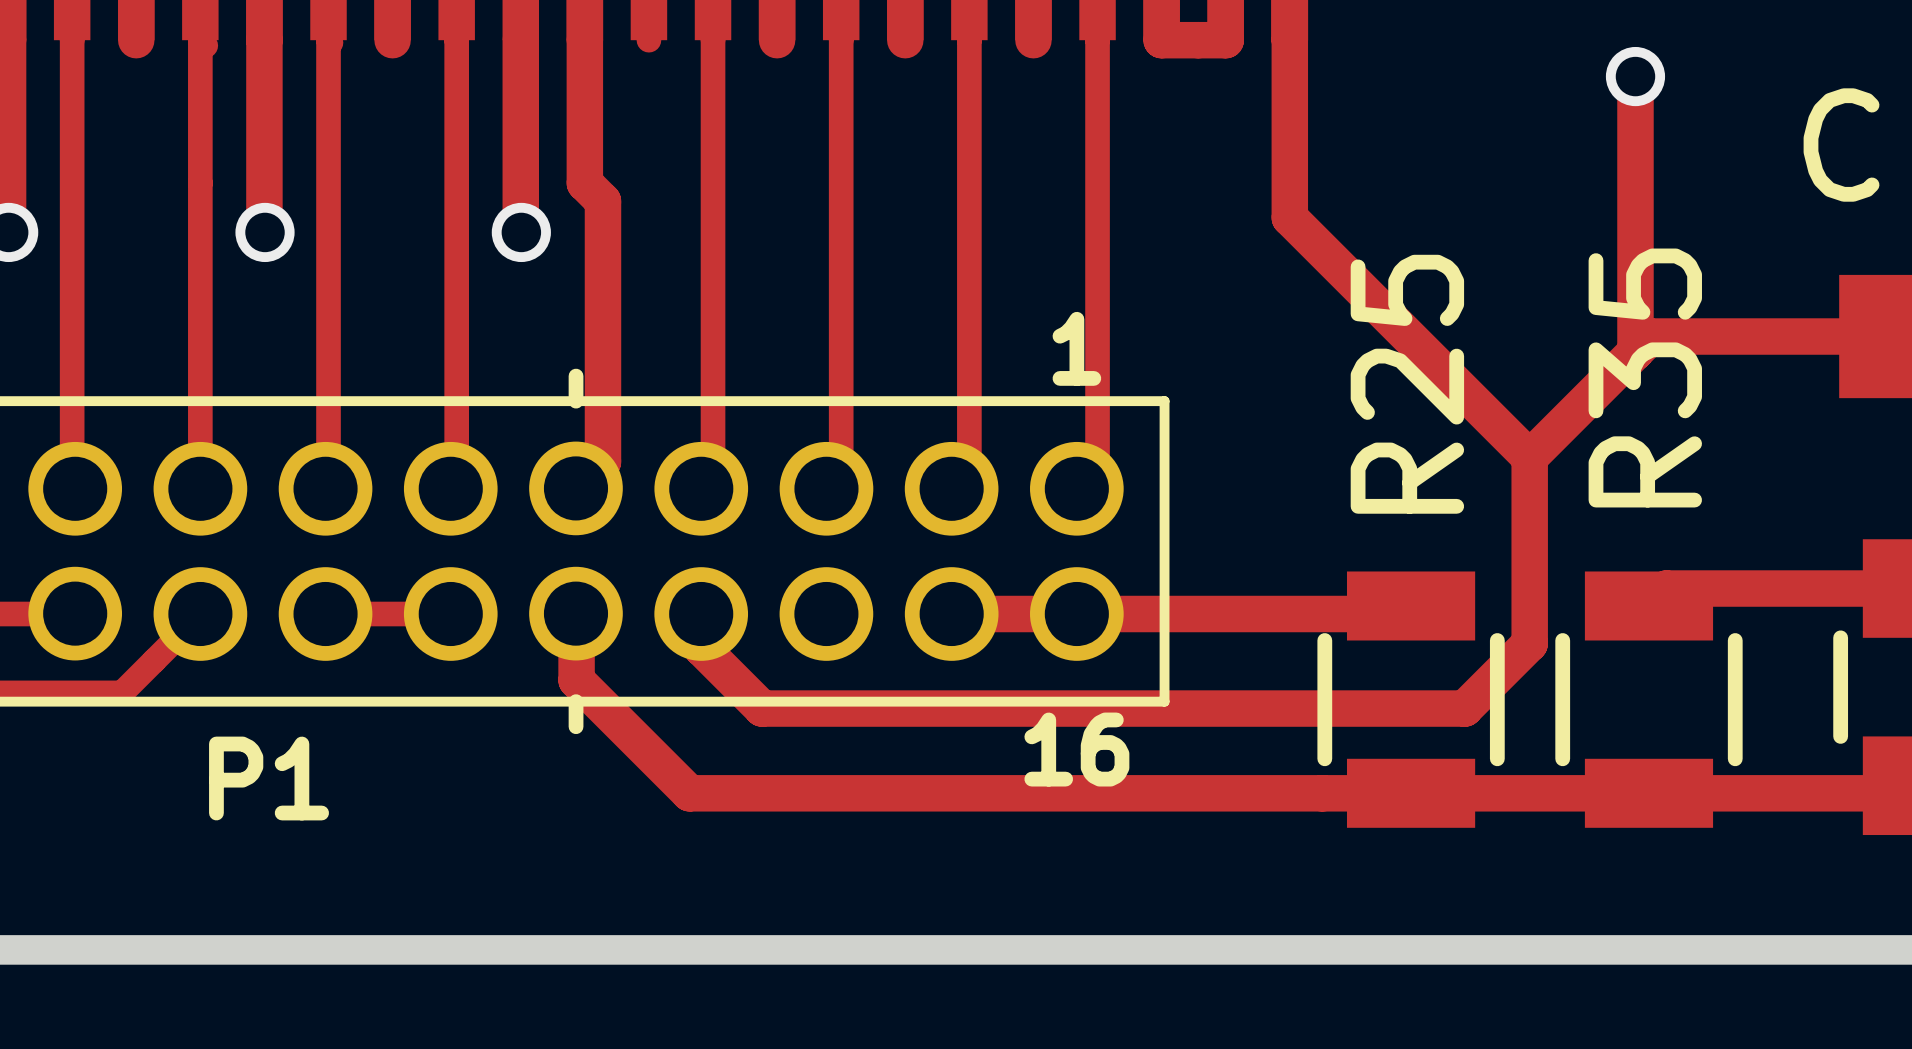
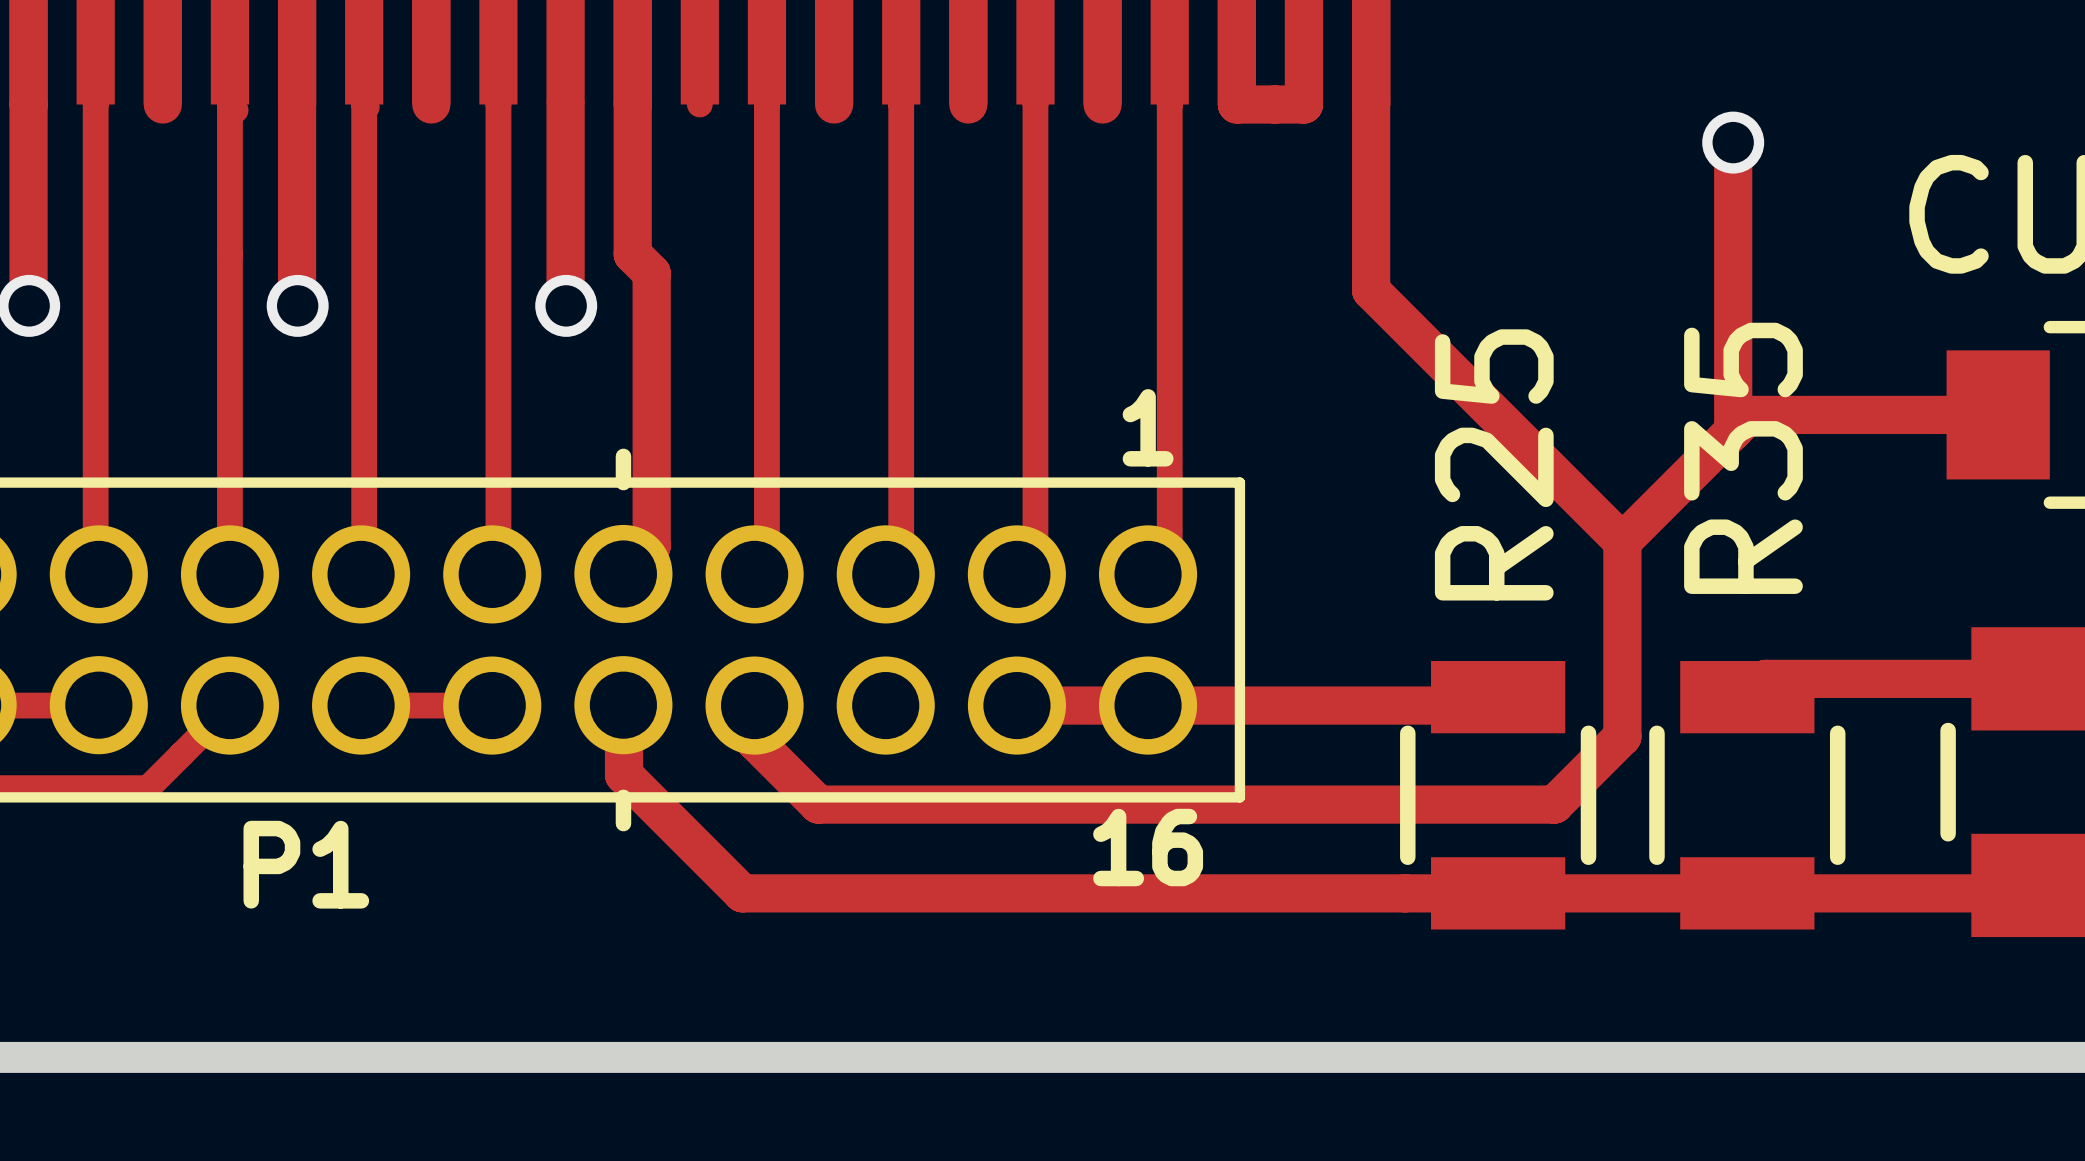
P1 name position: P1 (269, 778) -> P1 (306, 864)

